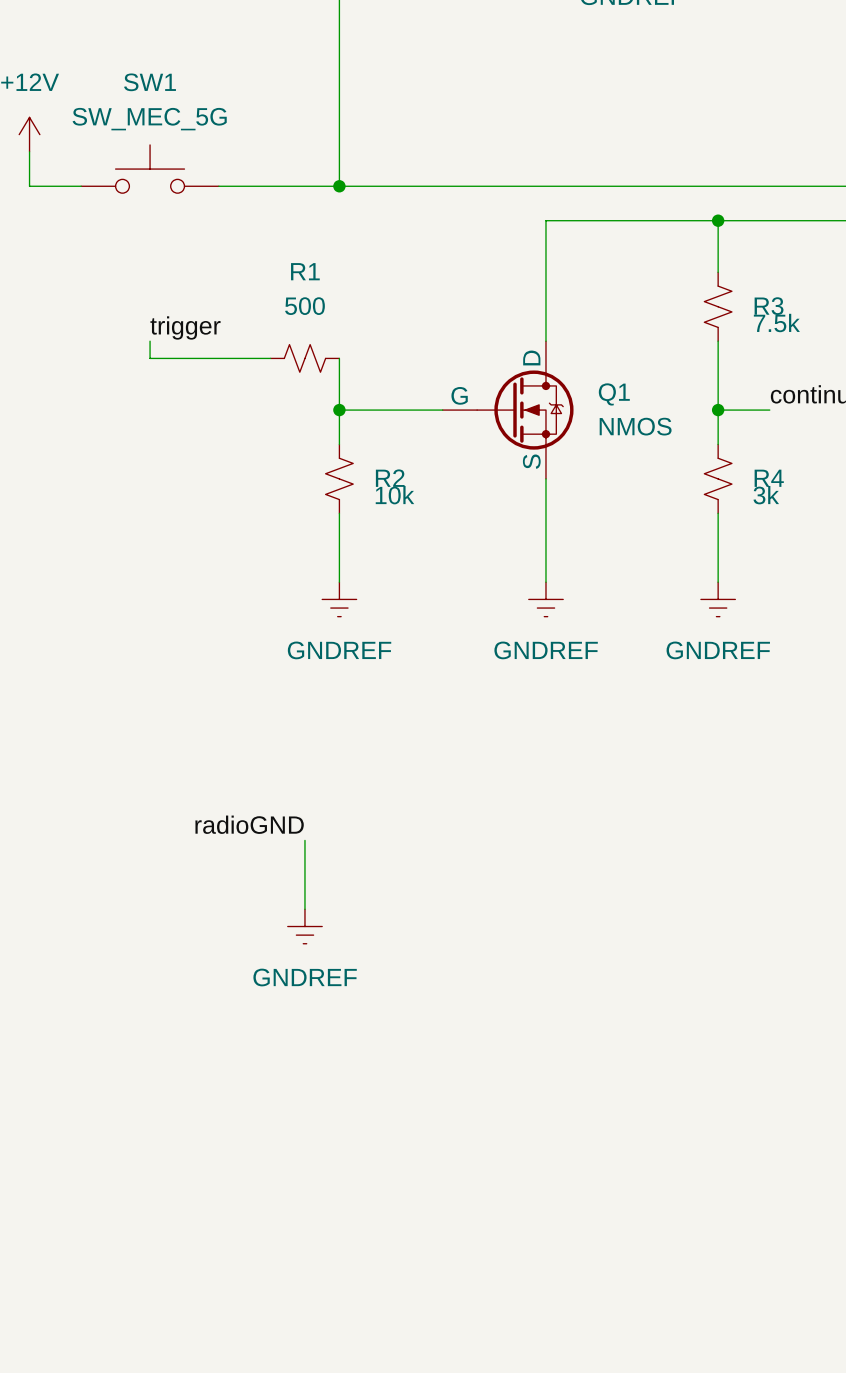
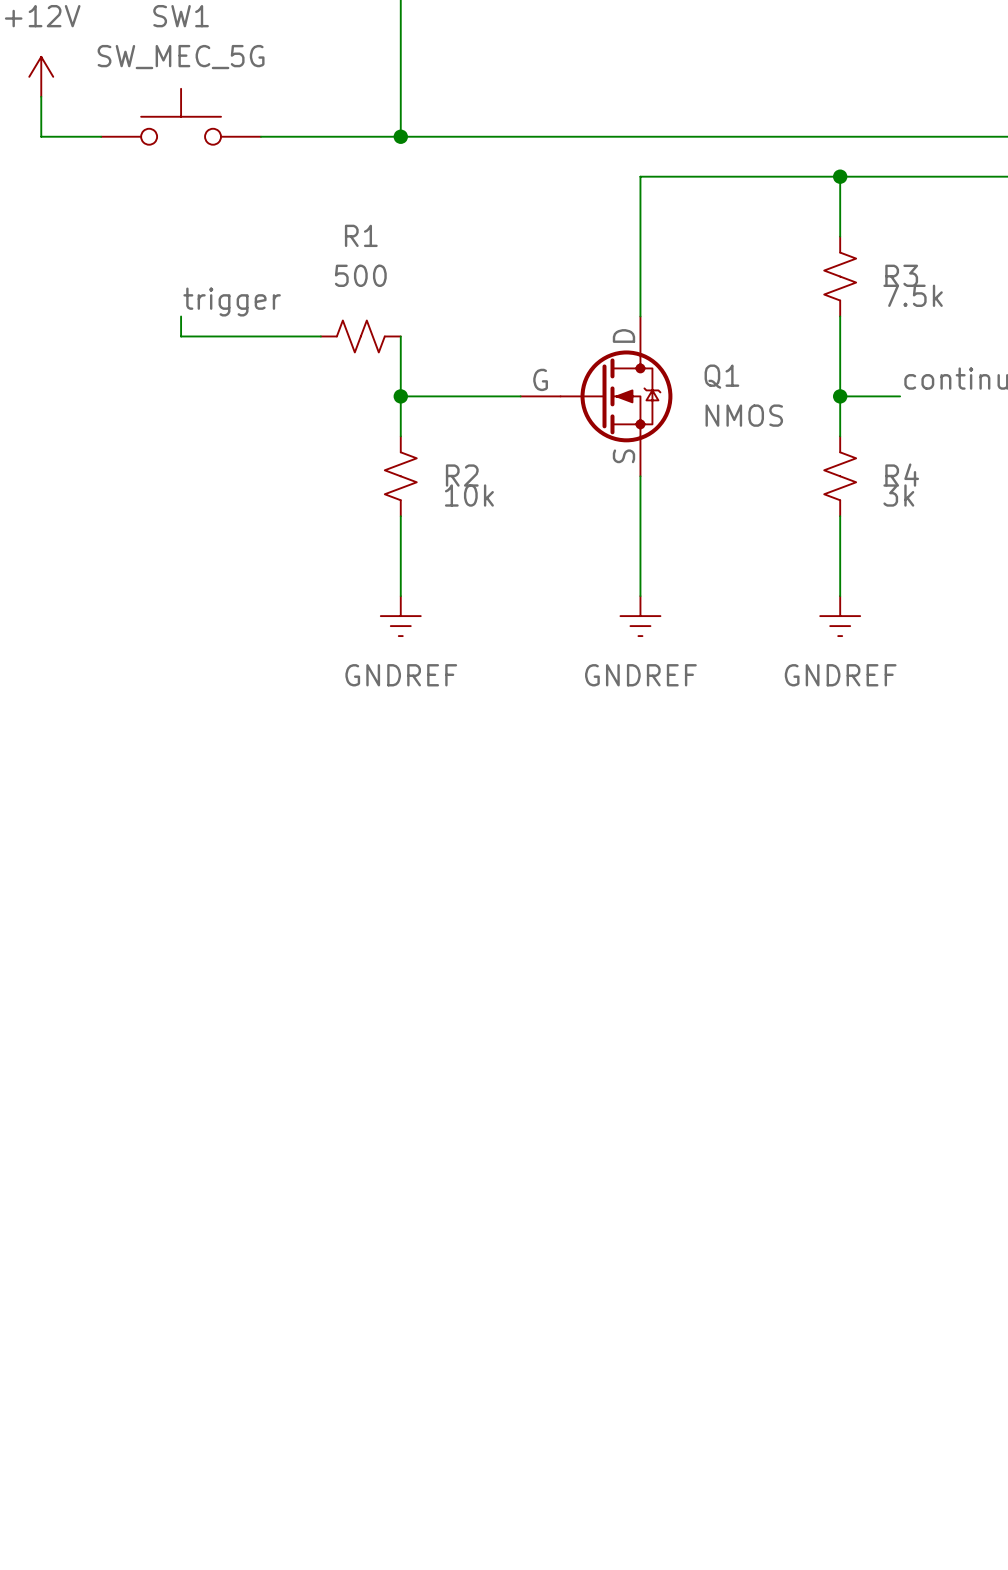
label: radioGND (249, 824) -> none
wire: (304, 840) (304, 909) -> none
power symbol: GNDREF (304, 926) -> none

